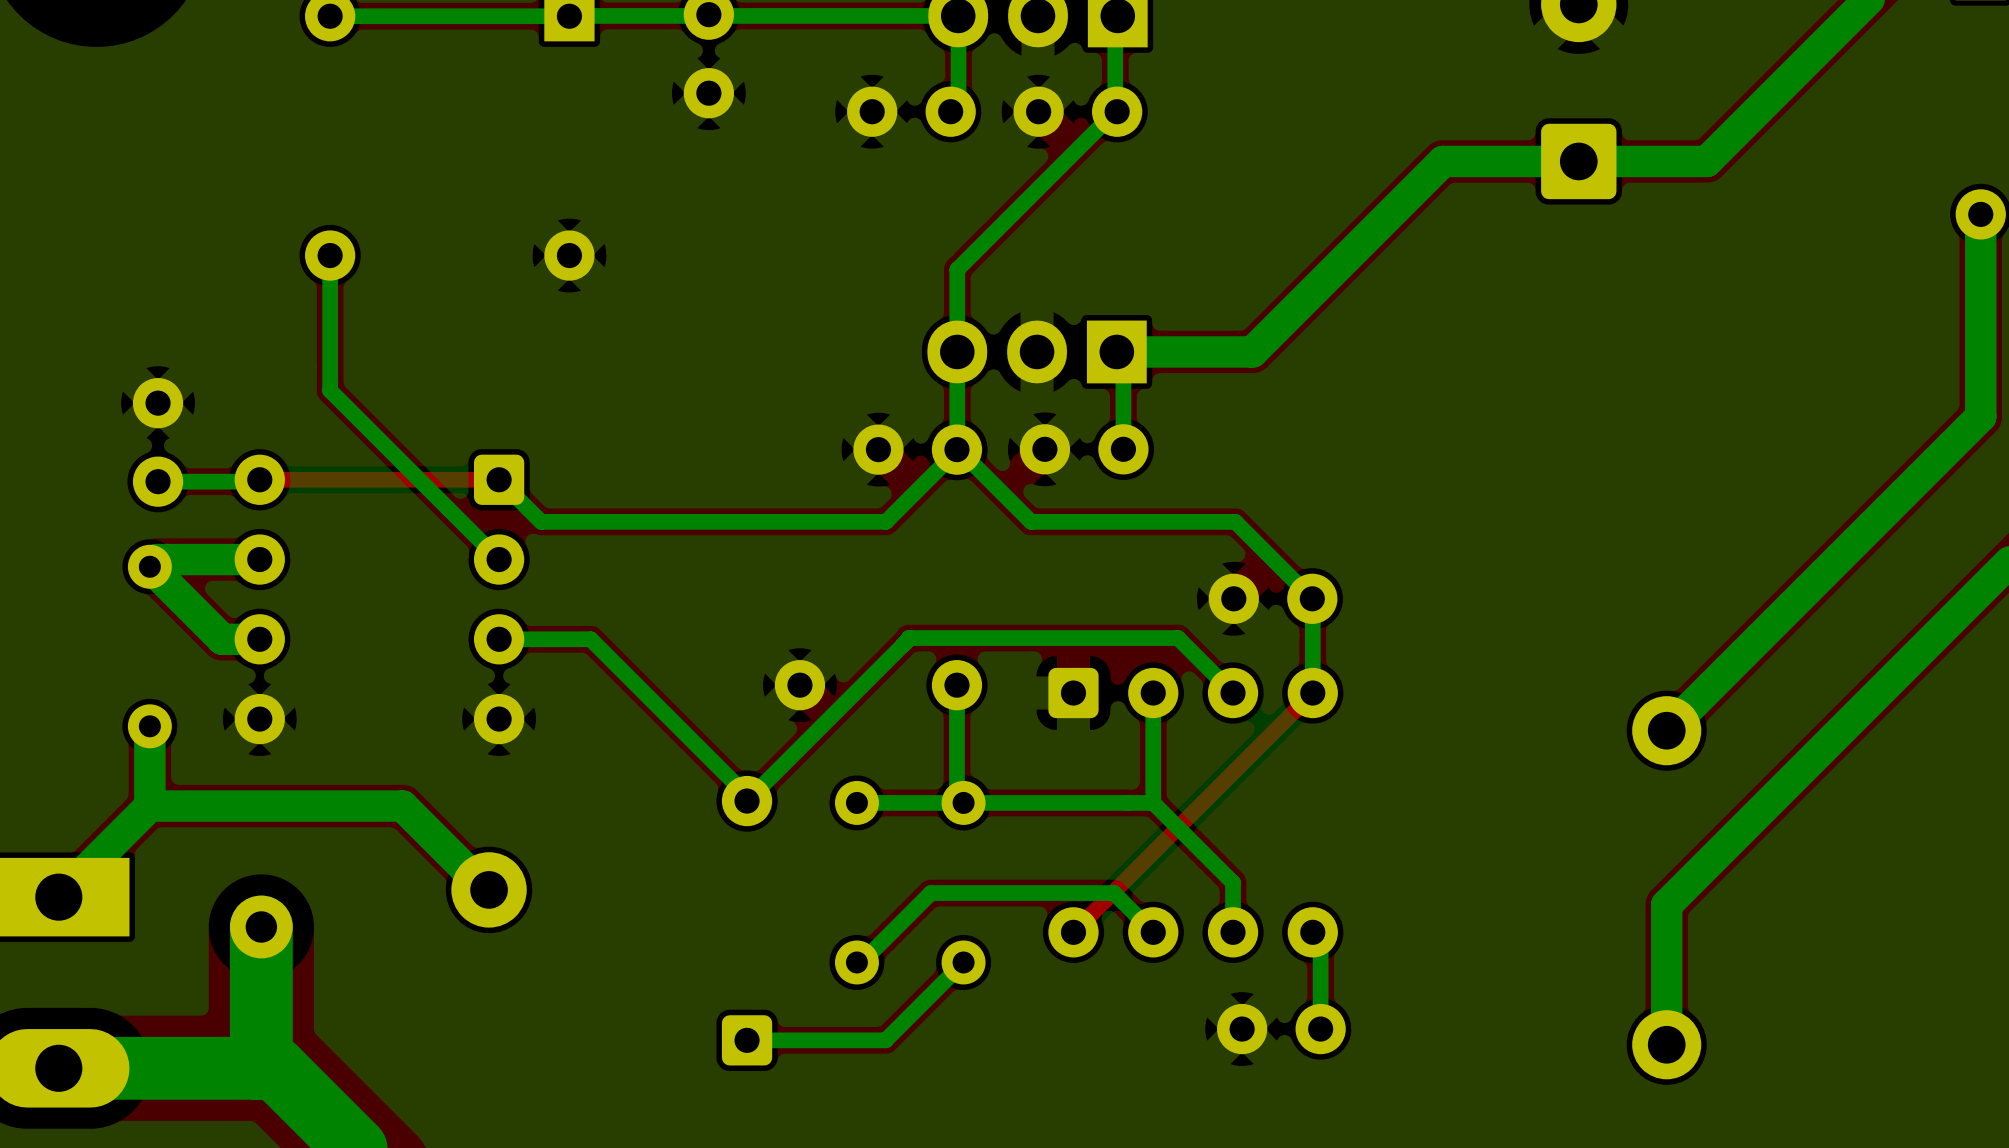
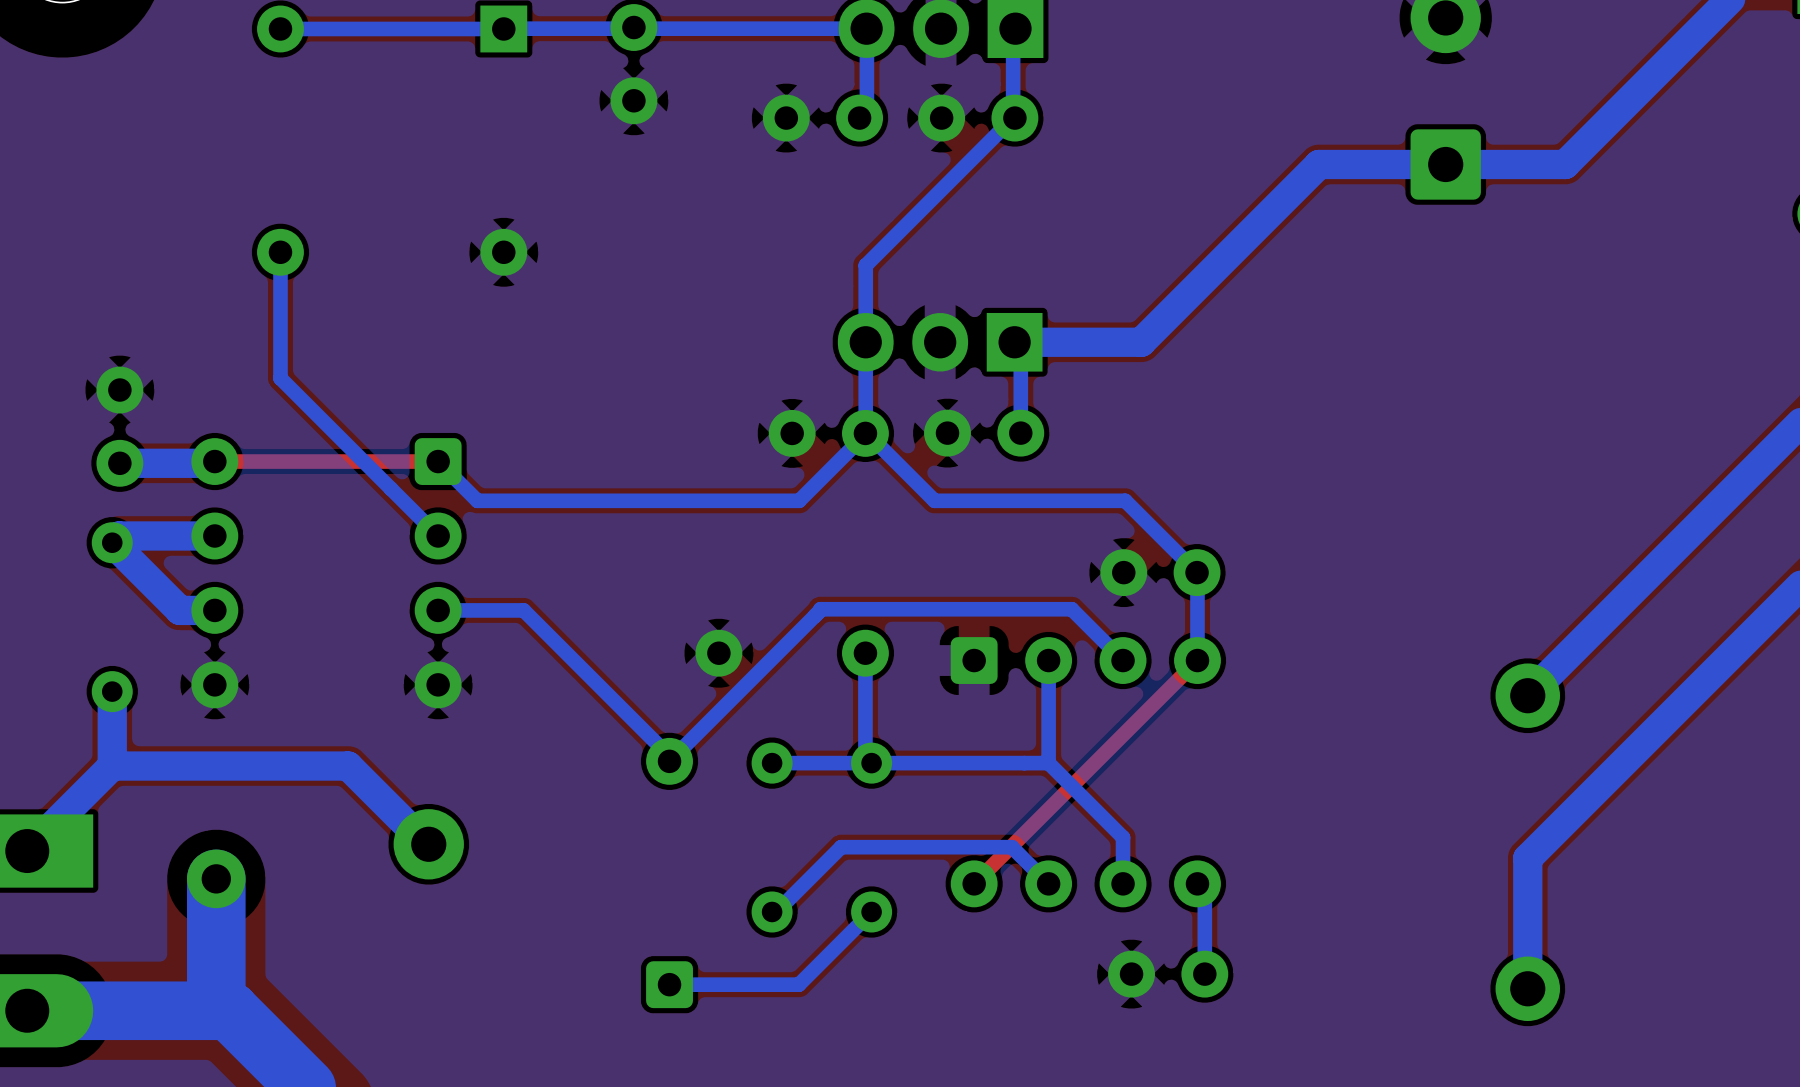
bottom track width: thin (259, 479) (257, 481) (158, 481) -> thick (214, 461) (213, 463) (119, 463)

